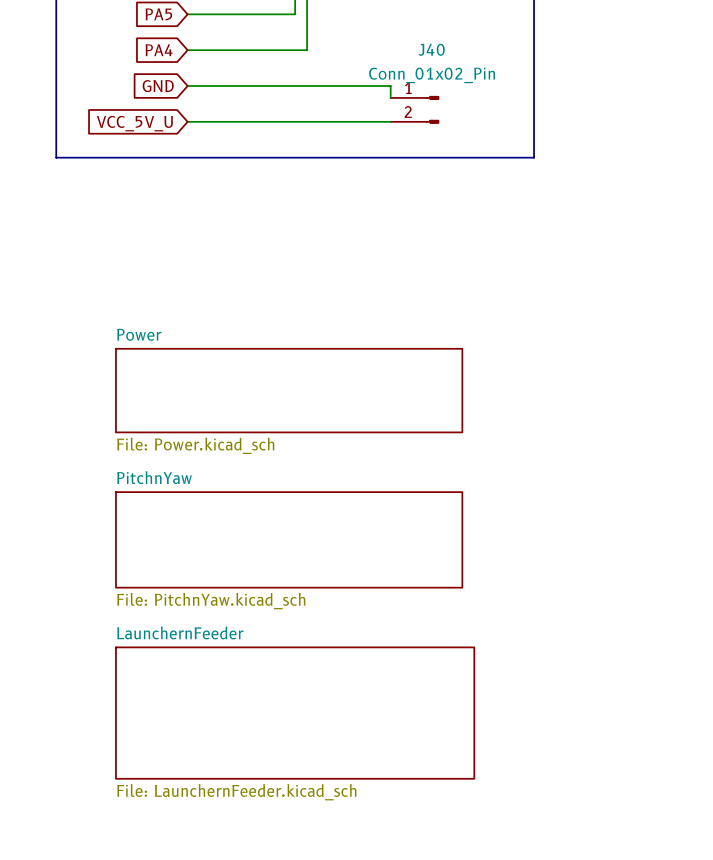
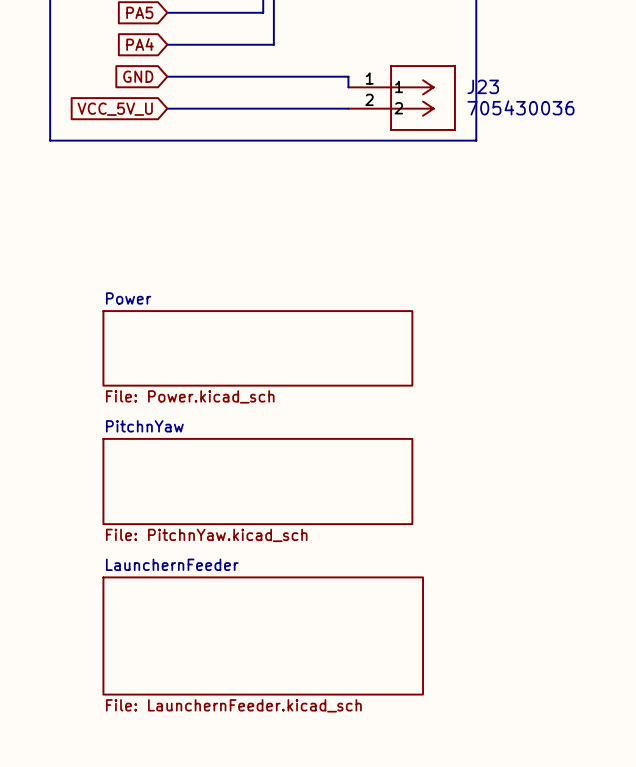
J40: Conn_01x02_Pin (414, 109) -> none
J23: none -> 705430036 (401, 98)

